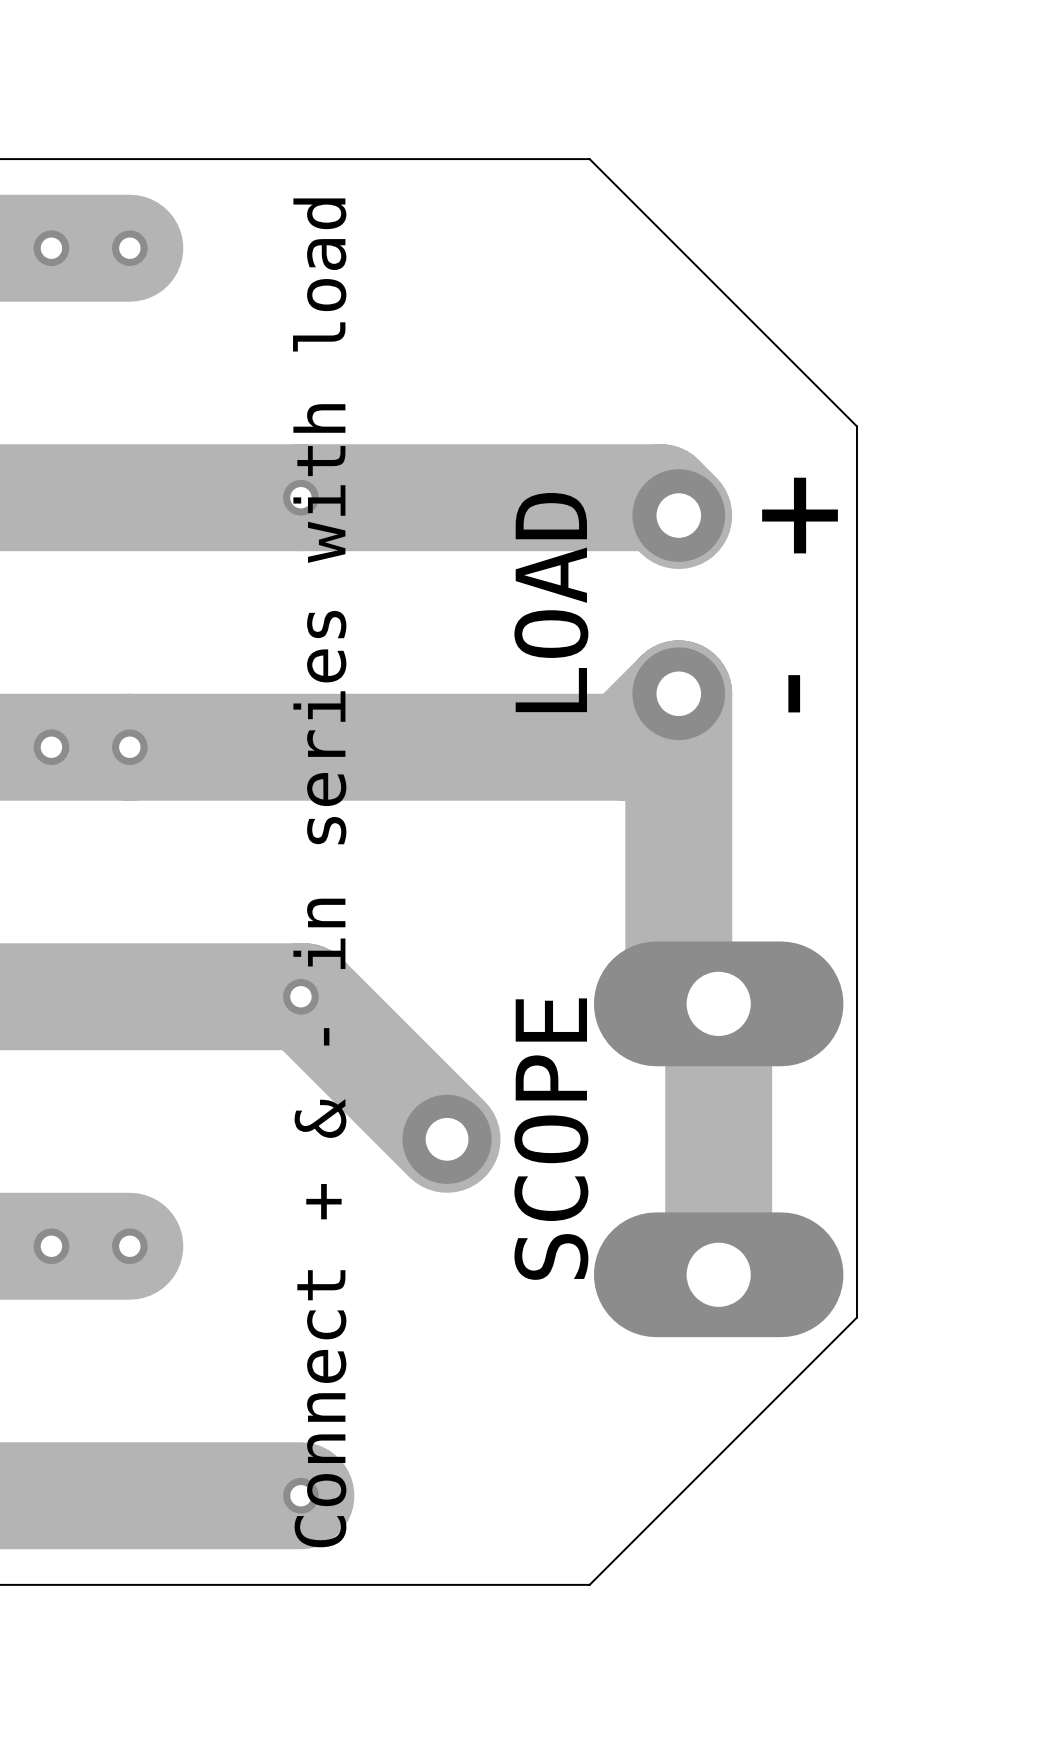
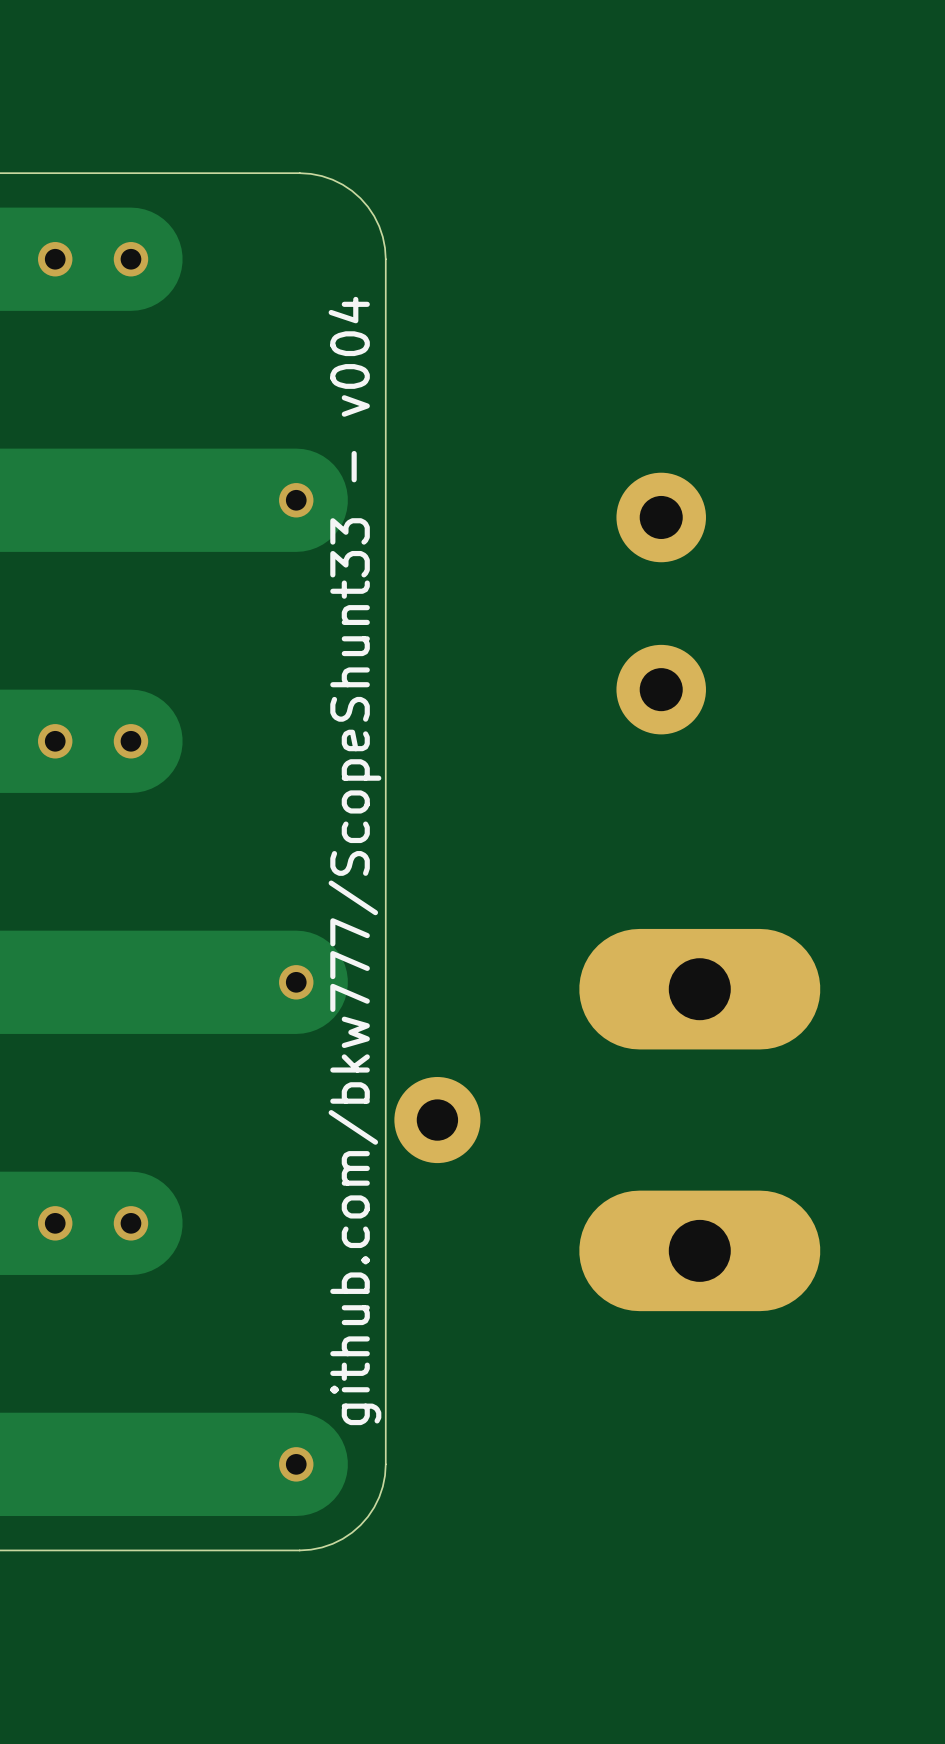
board edge: (304, 159) (589, 159) (856, 426) (856, 1317) (589, 1584) (304, 1584) -> (299, 173) (332, 179) (360, 198) (379, 226) (385, 259) (385, 1475) (374, 1507) (360, 1525) (332, 1543) (299, 1550)
track: (300, 497) (660, 497) (678, 515) -> none
text: + (800, 515) -> none
text: LOAD (551, 602) -> none
text: - (794, 693) -> none
track: (129, 747) (625, 747) (678, 693) (678, 963) (718, 1003) (718, 1274) -> none
text: Connect + & - in series with load (319, 872) -> github.com/bkw777/ScopeShunt33 - v004 (354, 860)
track: (300, 996) (304, 996) (447, 1139) -> none
text: SCOPE (551, 1139) -> none

